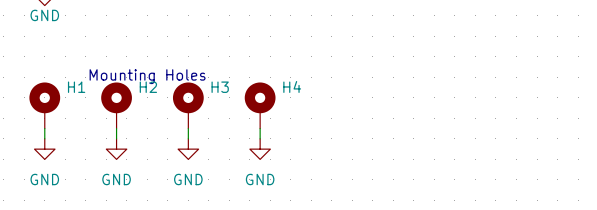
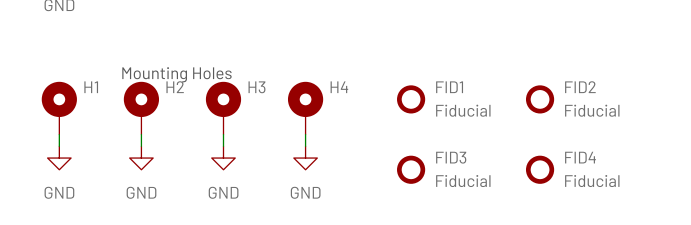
FID1: none -> Fiducial (411, 99)
FID2: none -> Fiducial (540, 99)
FID3: none -> Fiducial (411, 169)
FID4: none -> Fiducial (540, 169)

